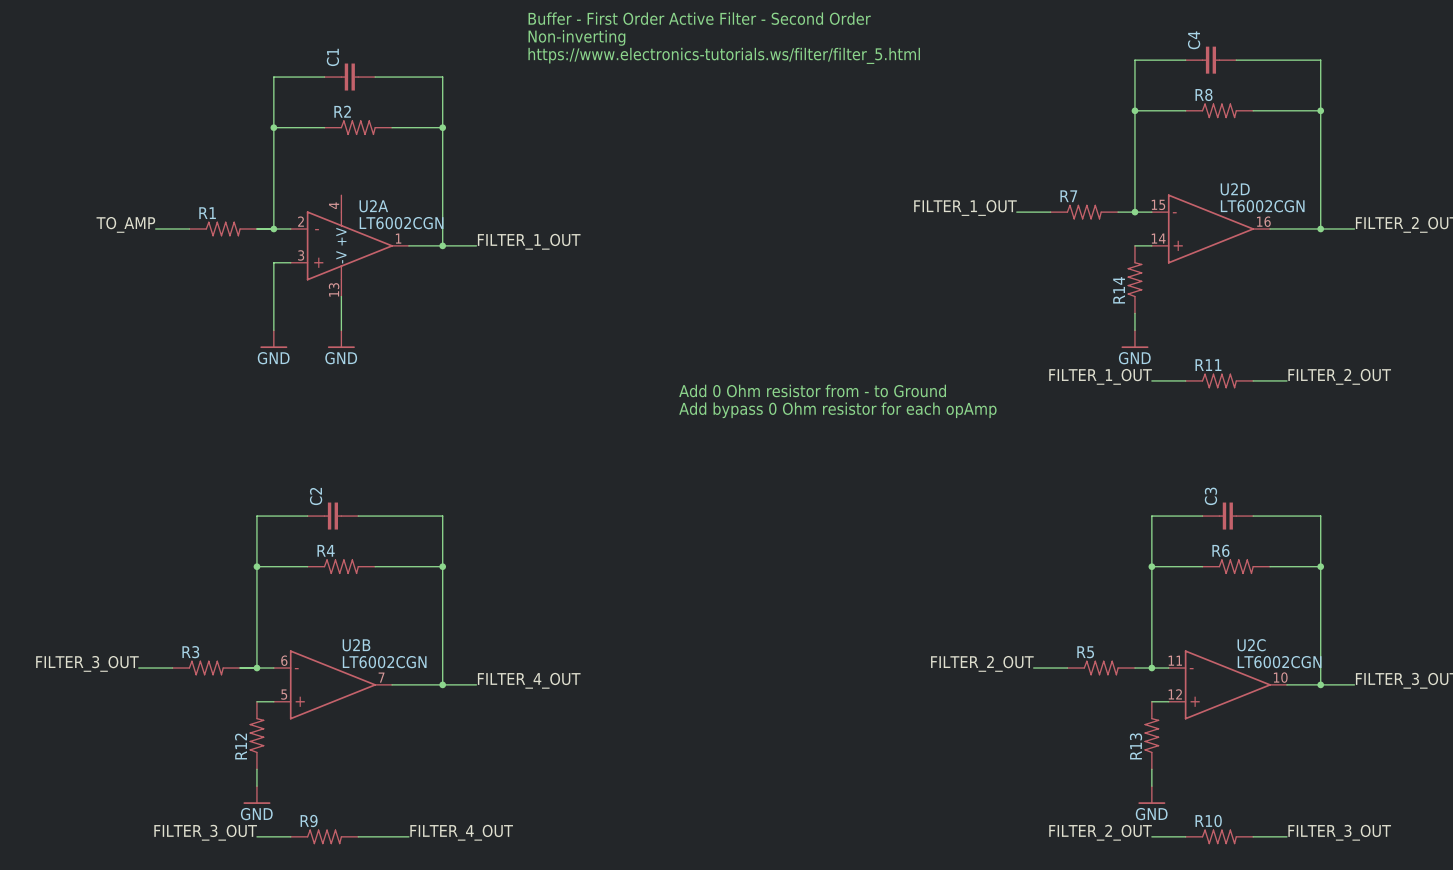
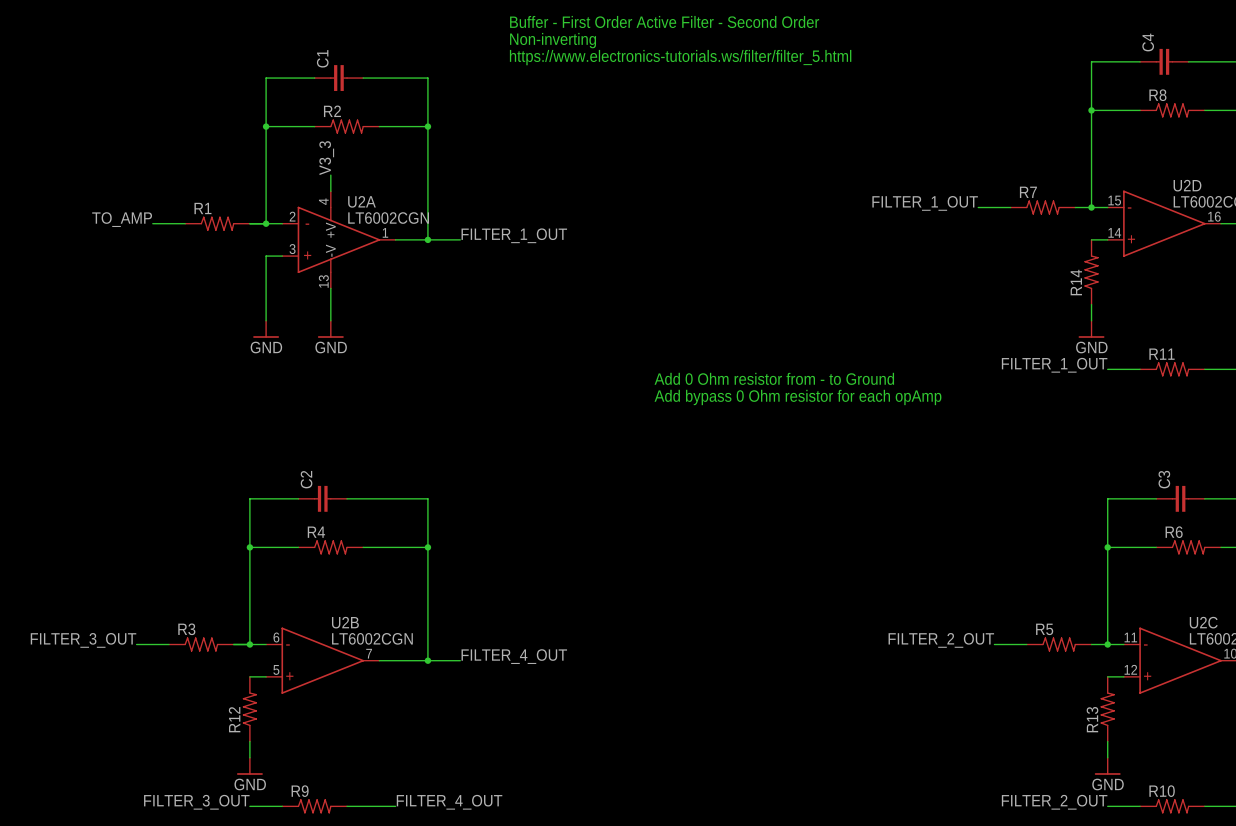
label: none -> V3_3 (326, 158)
wire: none -> (330, 175) (330, 191)

